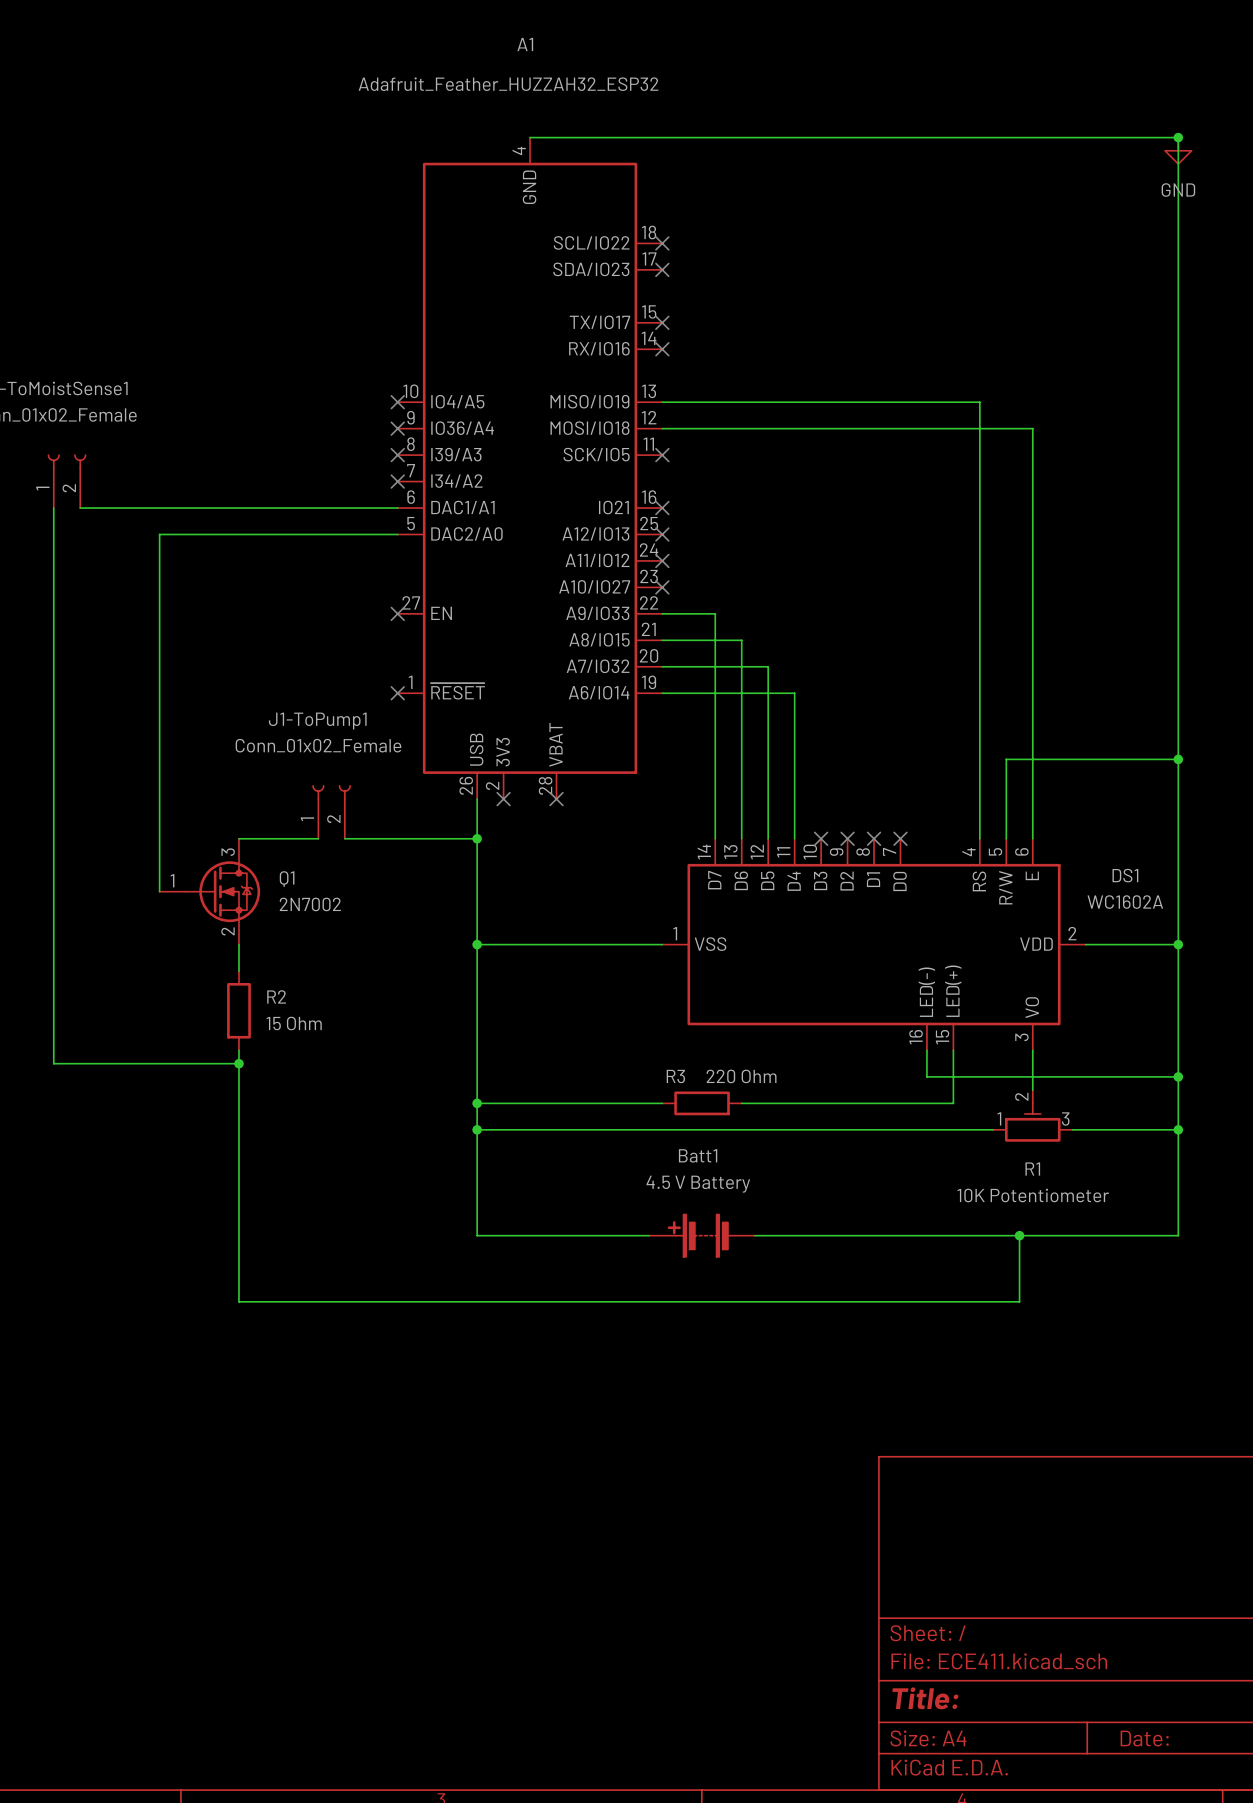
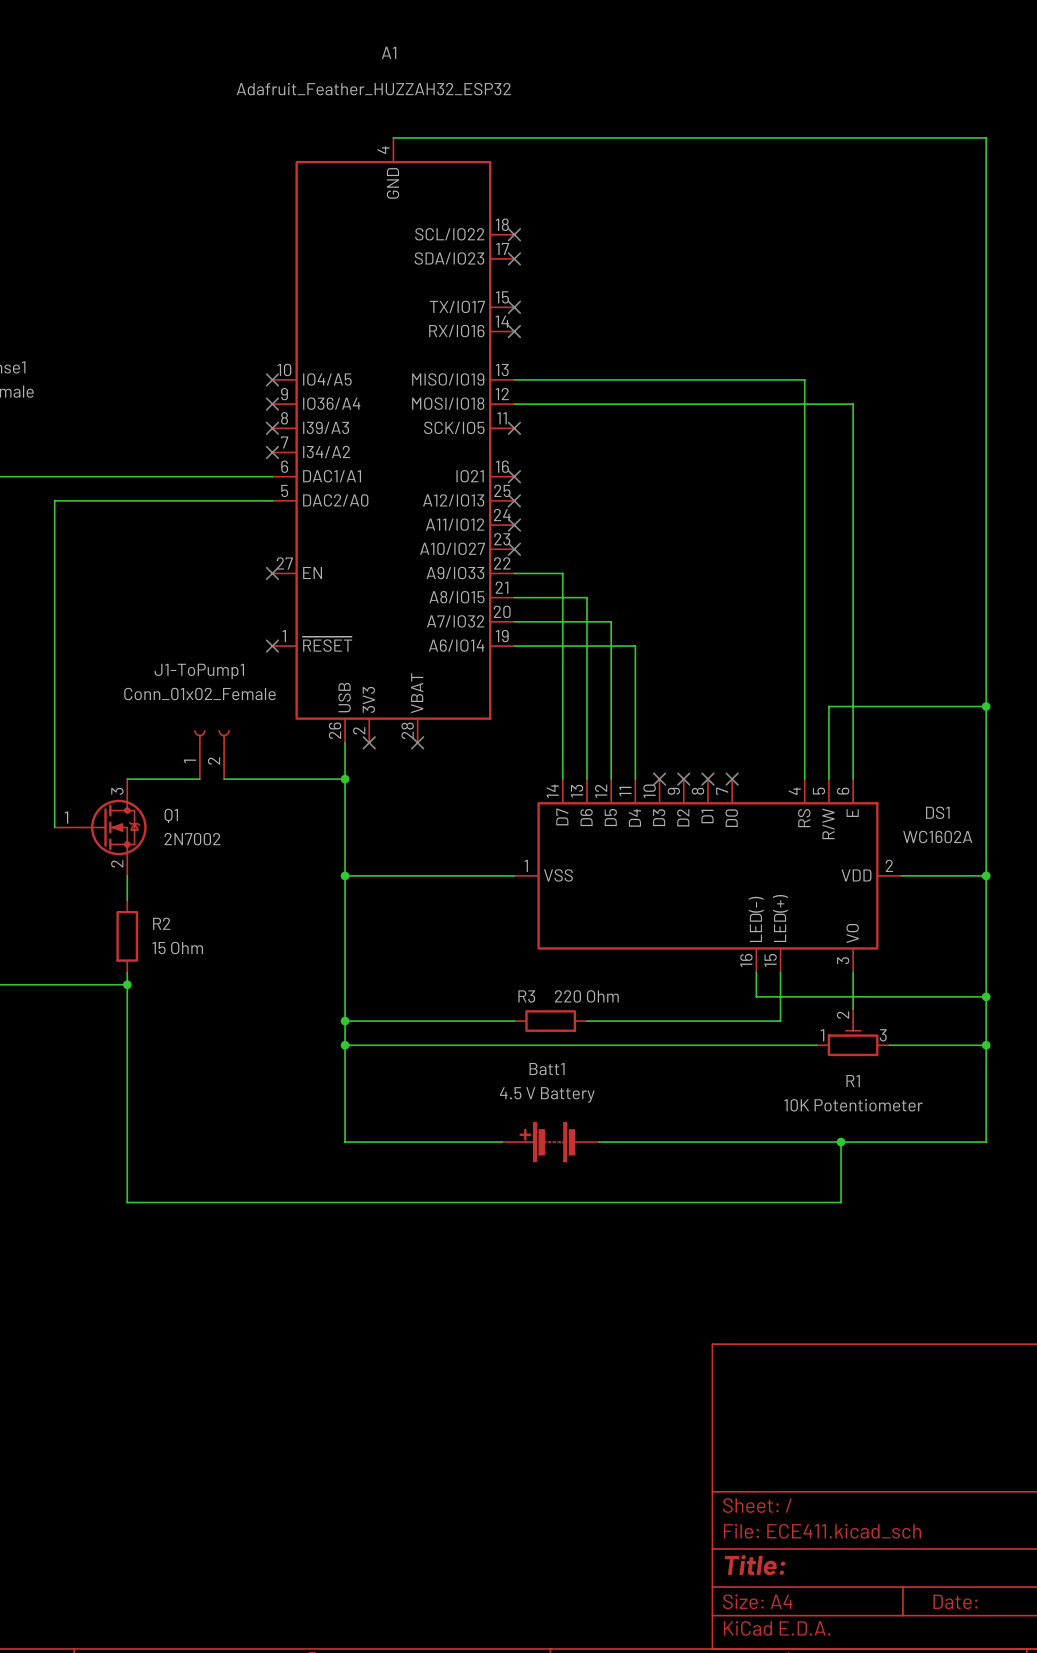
junction: (1178, 137) -> none
power symbol: GND (1178, 150) -> none

